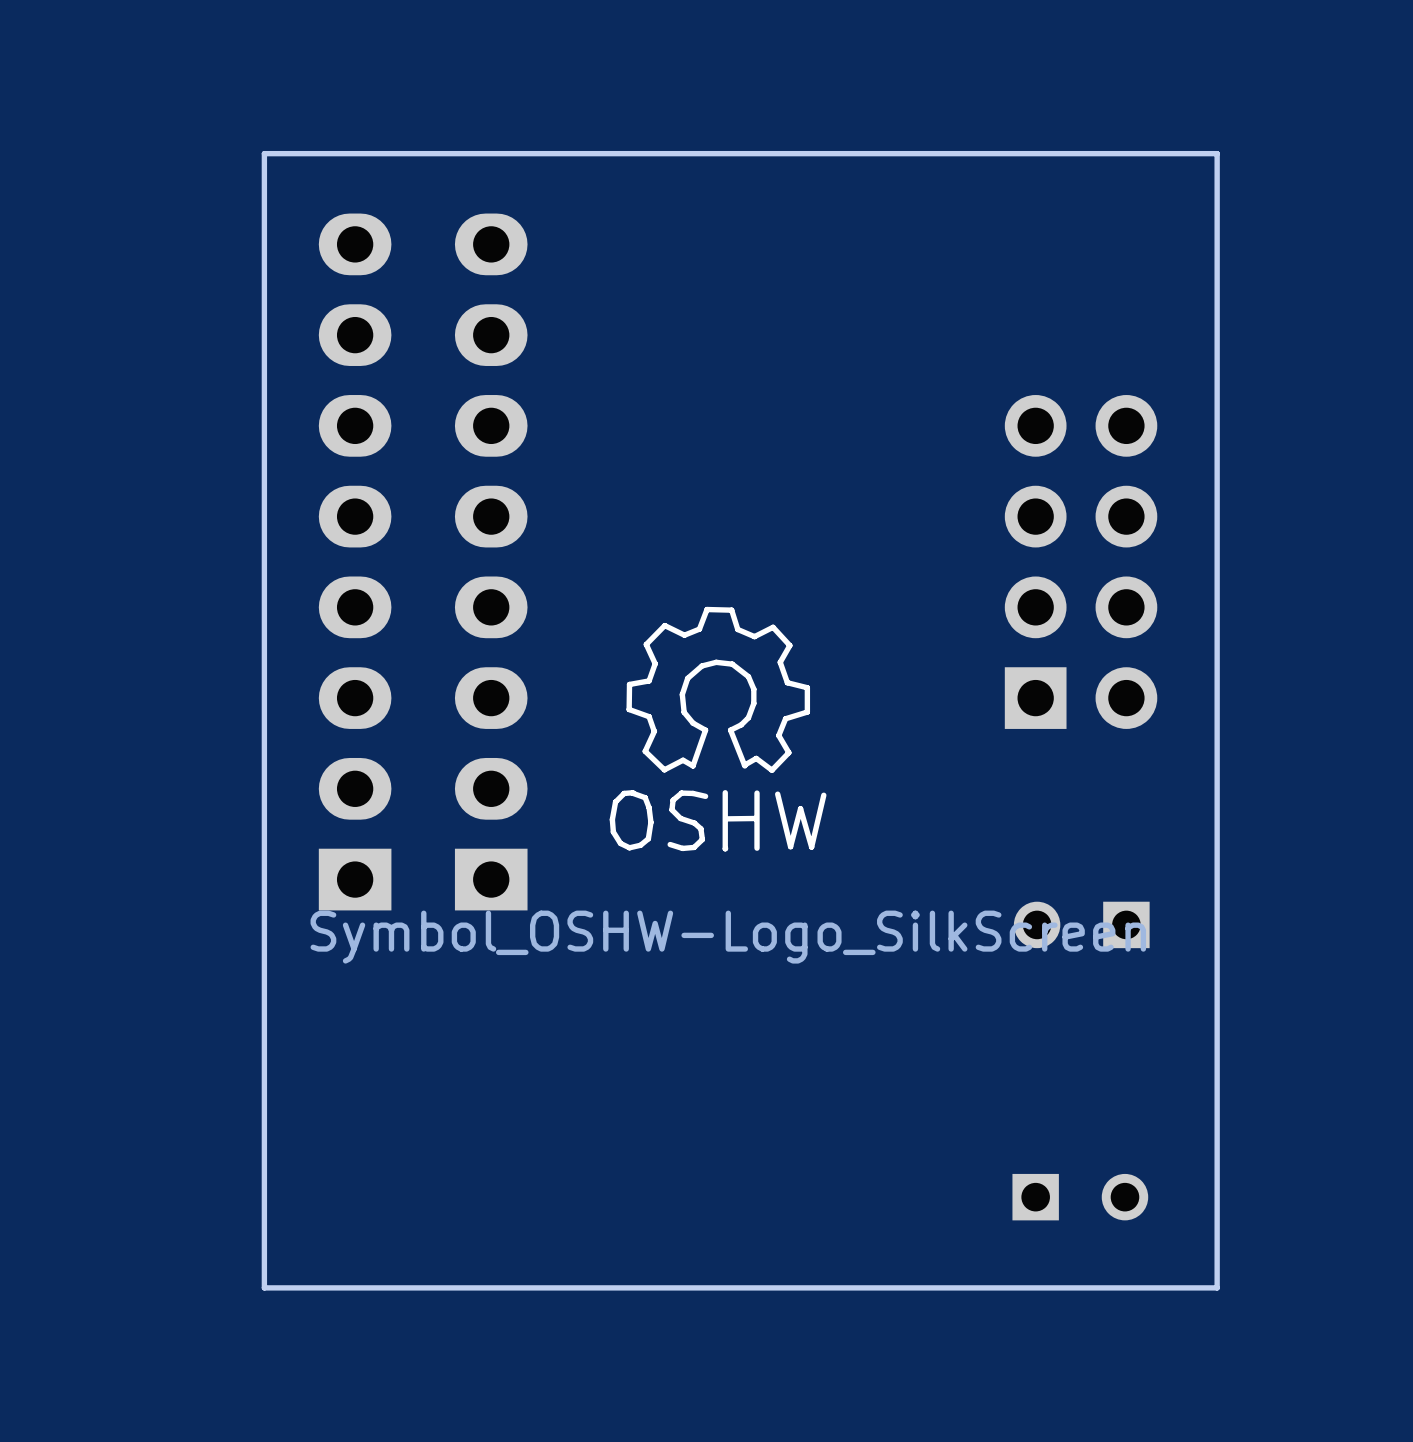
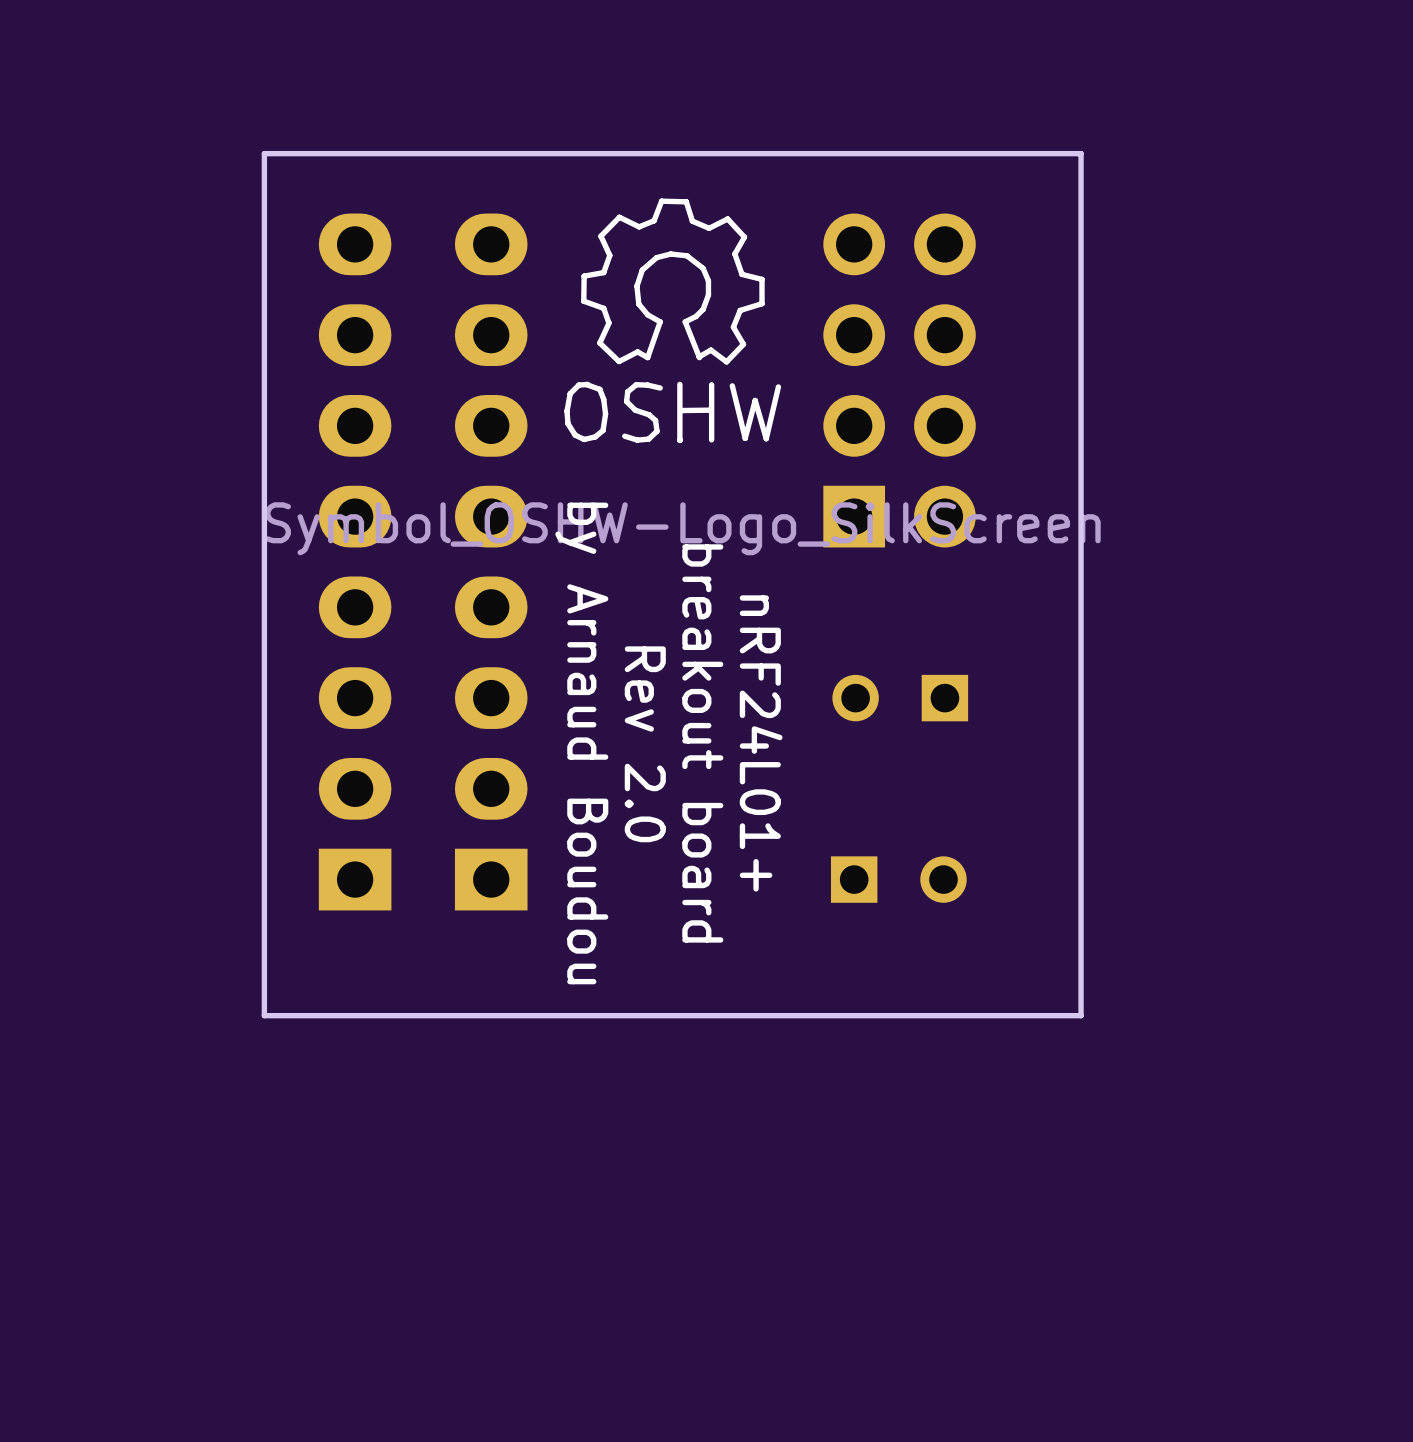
board edge: (1081, 153) (1217, 153) (1217, 1287) (264, 1287) (264, 1015) -> (1081, 153) (1081, 1015) (264, 1015)
part position: (1081, 561) -> (899, 380)
part: none -> (900, 698)
drawing position: (718, 729) -> (672, 320)
text: none -> by Arnaud Boudou (581, 743)
text: none -> breakout board (702, 743)
text: none -> nRF24L01+ (761, 743)
text: none -> Rev 2.0 (645, 744)
part: none -> (898, 879)
part: (1081, 924) -> none
part: (1080, 1197) -> none

